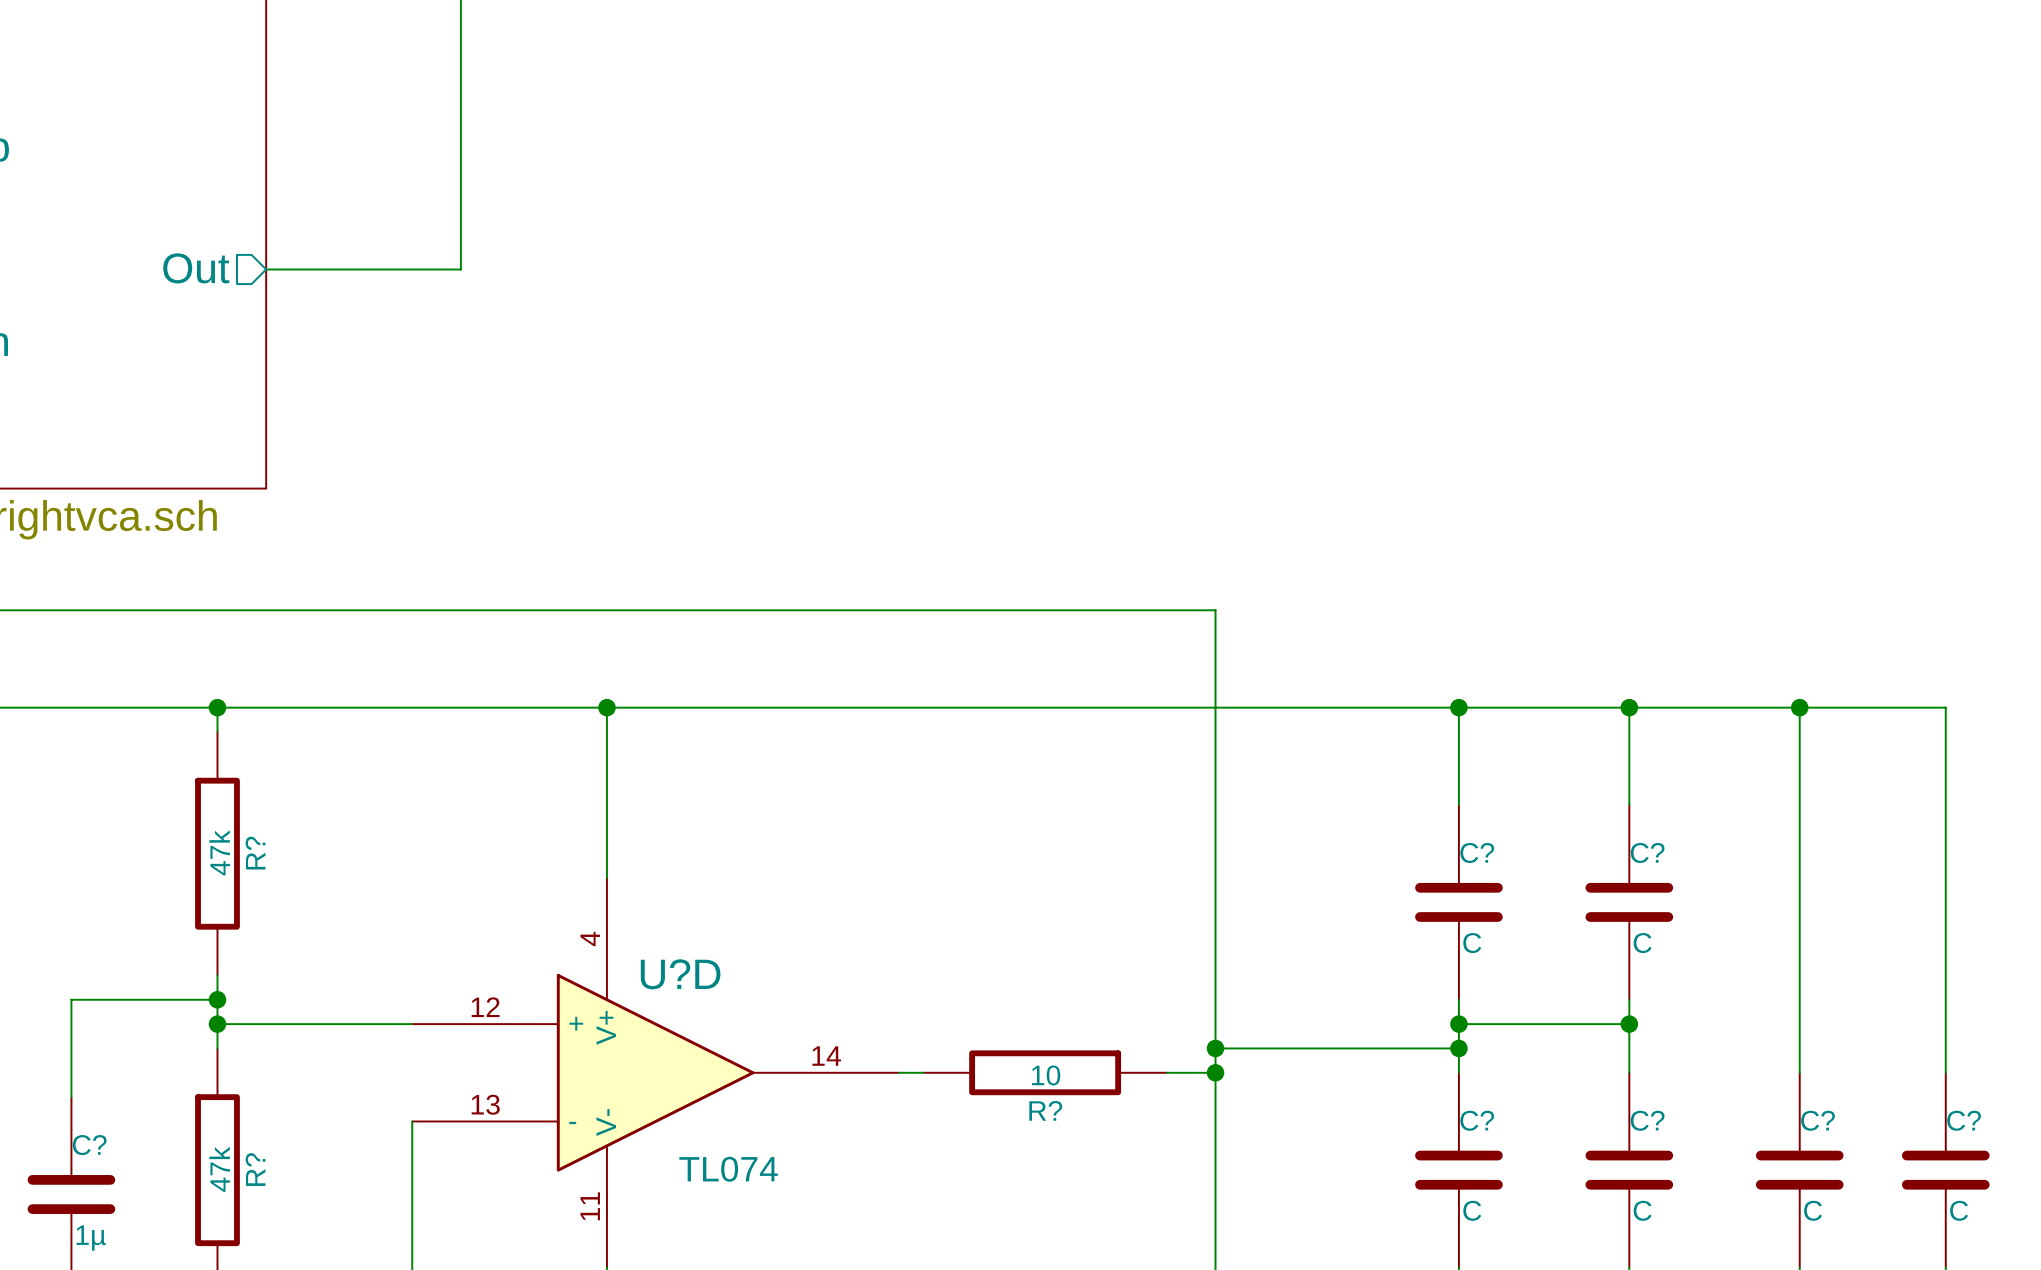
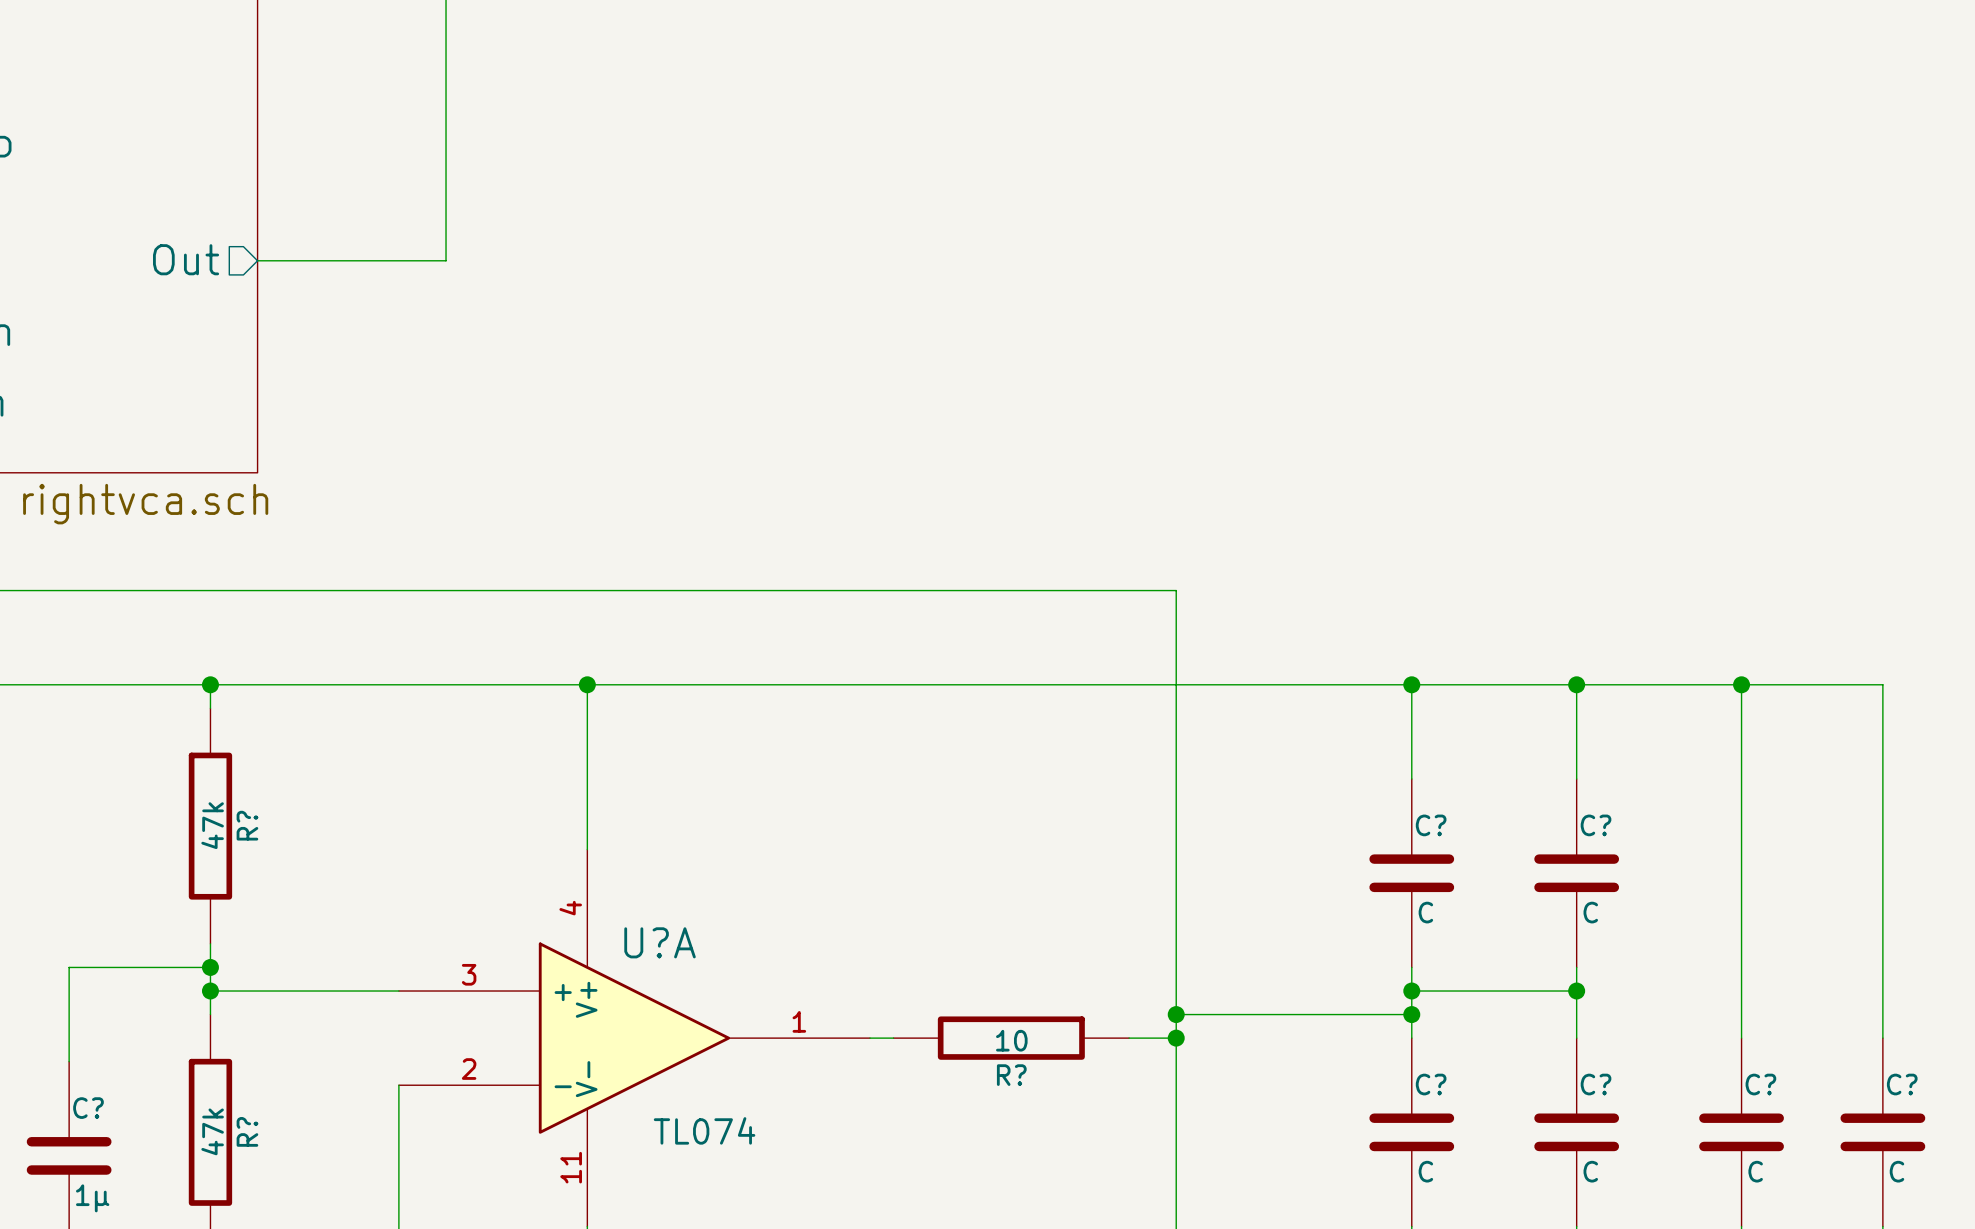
U?D name: U?D (680, 974) -> U?A (660, 942)
U?D pin number: 12 (485, 1007) -> 3 (469, 974)
U?D pin number: 14 (826, 1056) -> 1 (799, 1021)
U?D pin number: 13 (485, 1104) -> 2 (469, 1069)

